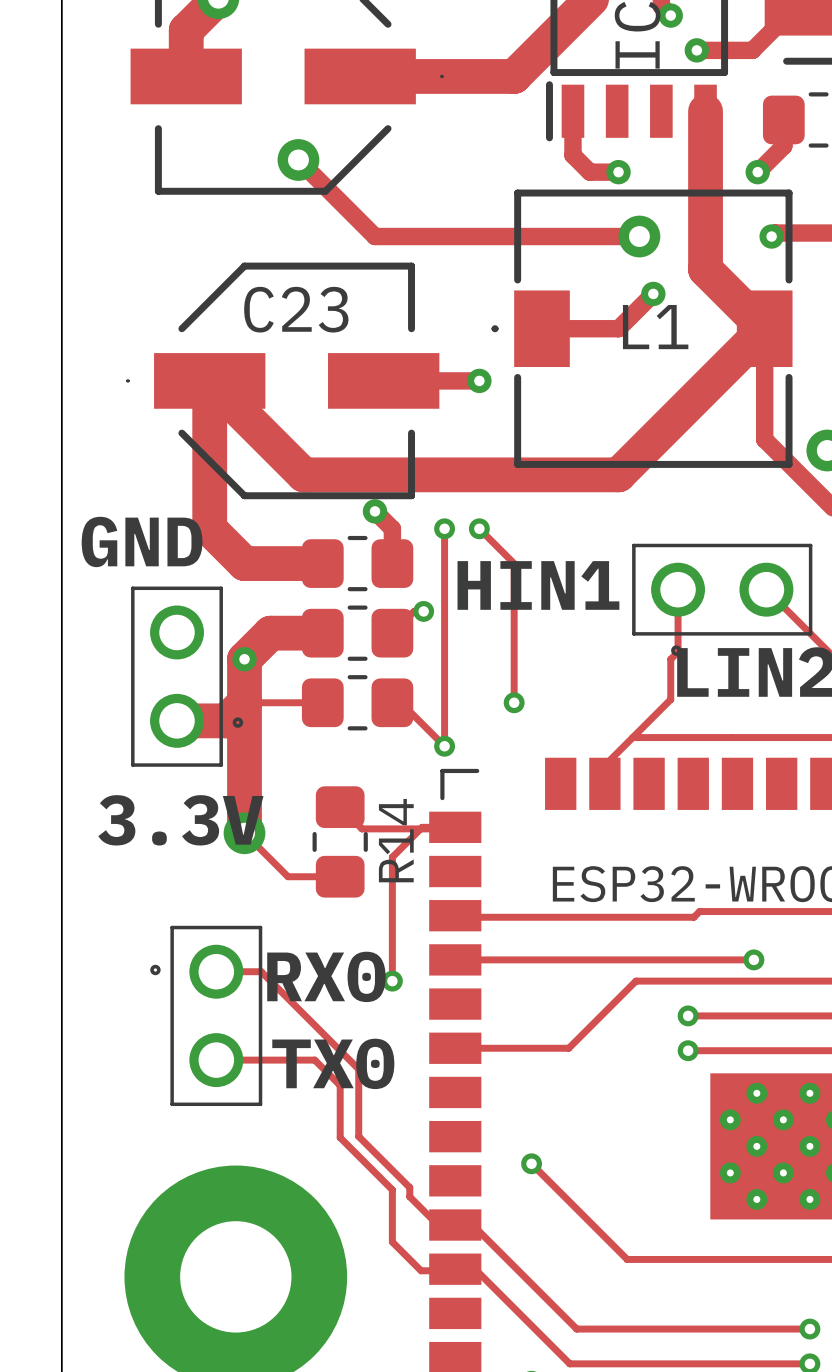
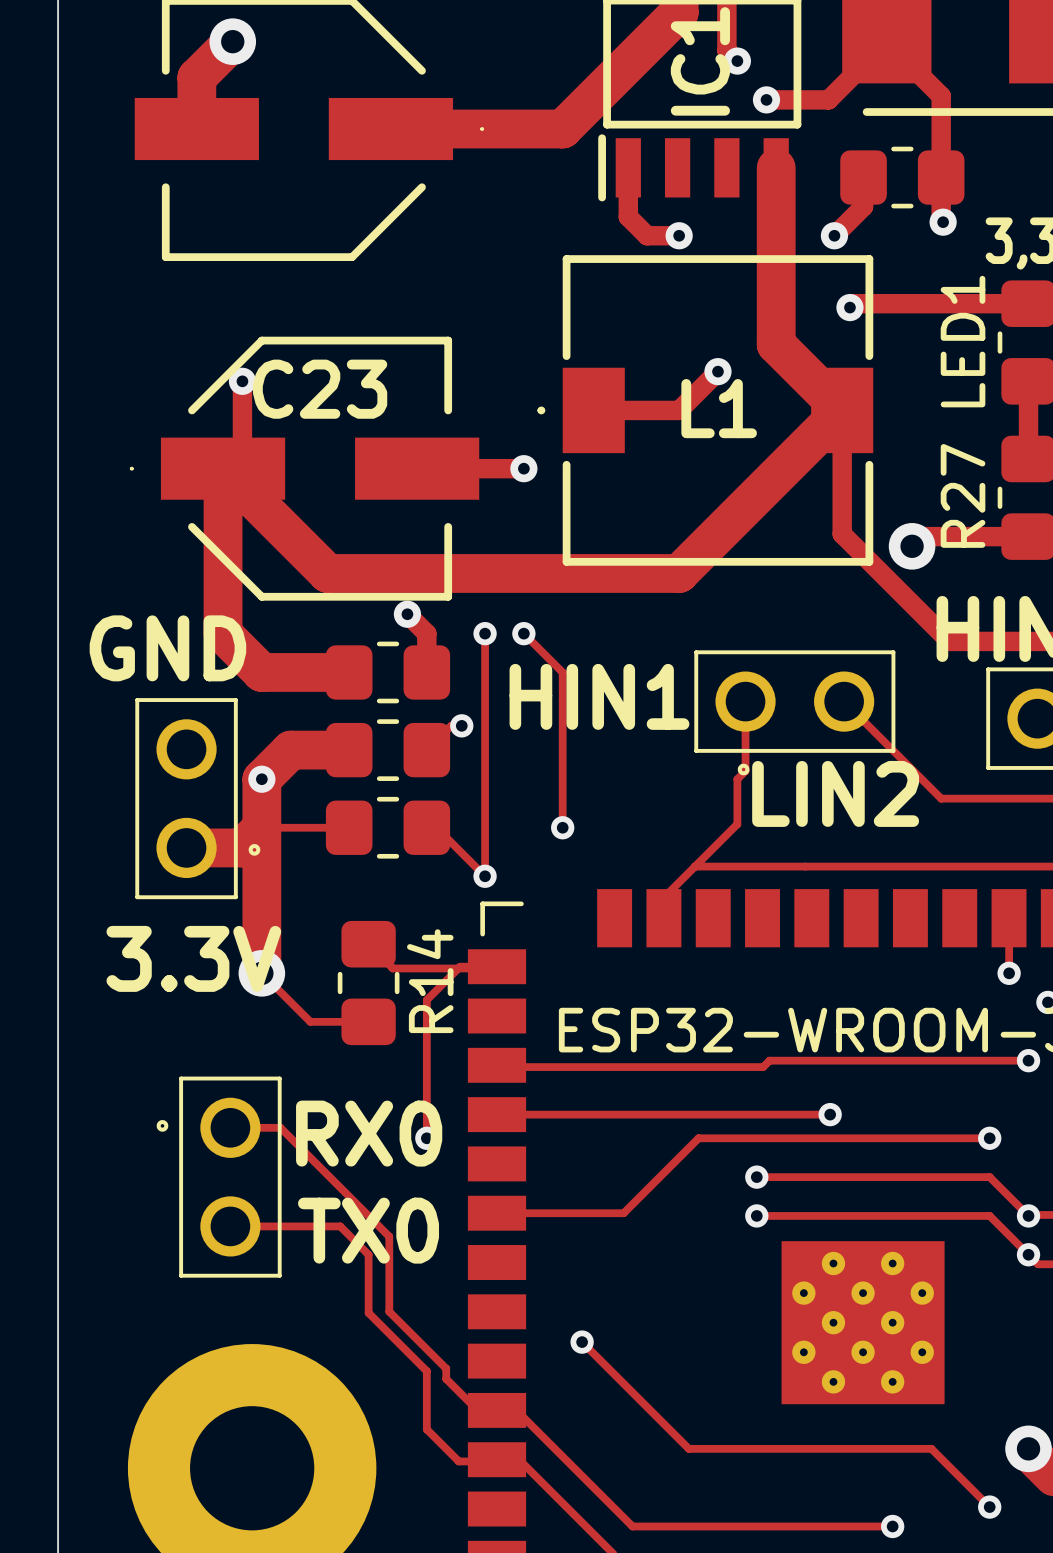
track: (298, 159) (374, 236) (639, 236) -> none
via: (298, 159) -> none
via: (639, 236) -> none
track: none -> (242, 381) (242, 449)
via: none -> (242, 381)

